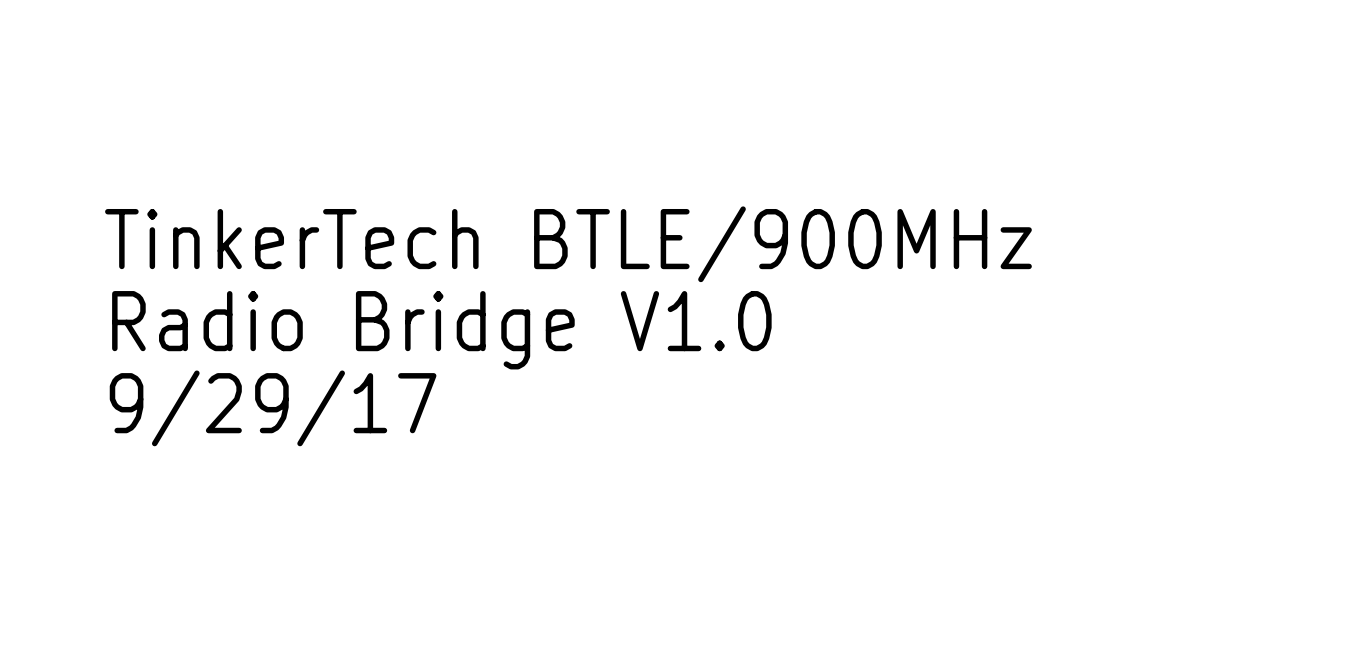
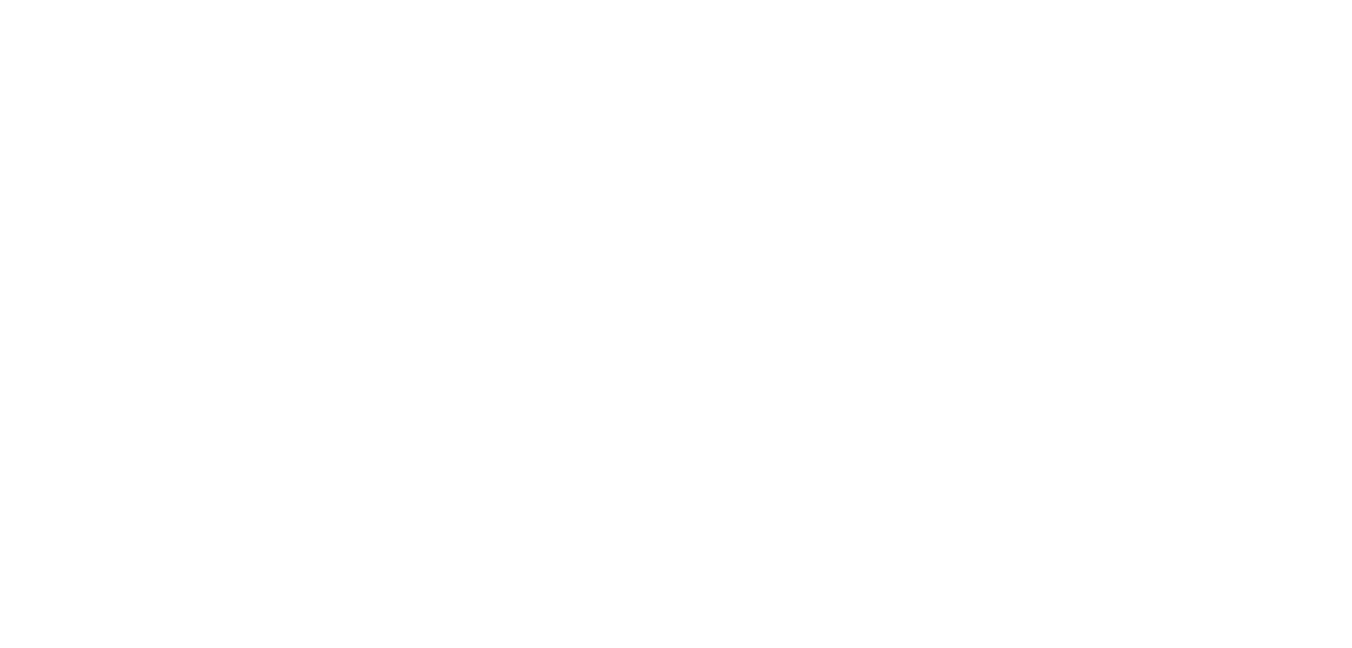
text: TinkerTech BTLE/900MHz (568, 244) -> none
text: Radio Bridge V1.0 (441, 330) -> none
text: 9/29/17 (273, 408) -> none

